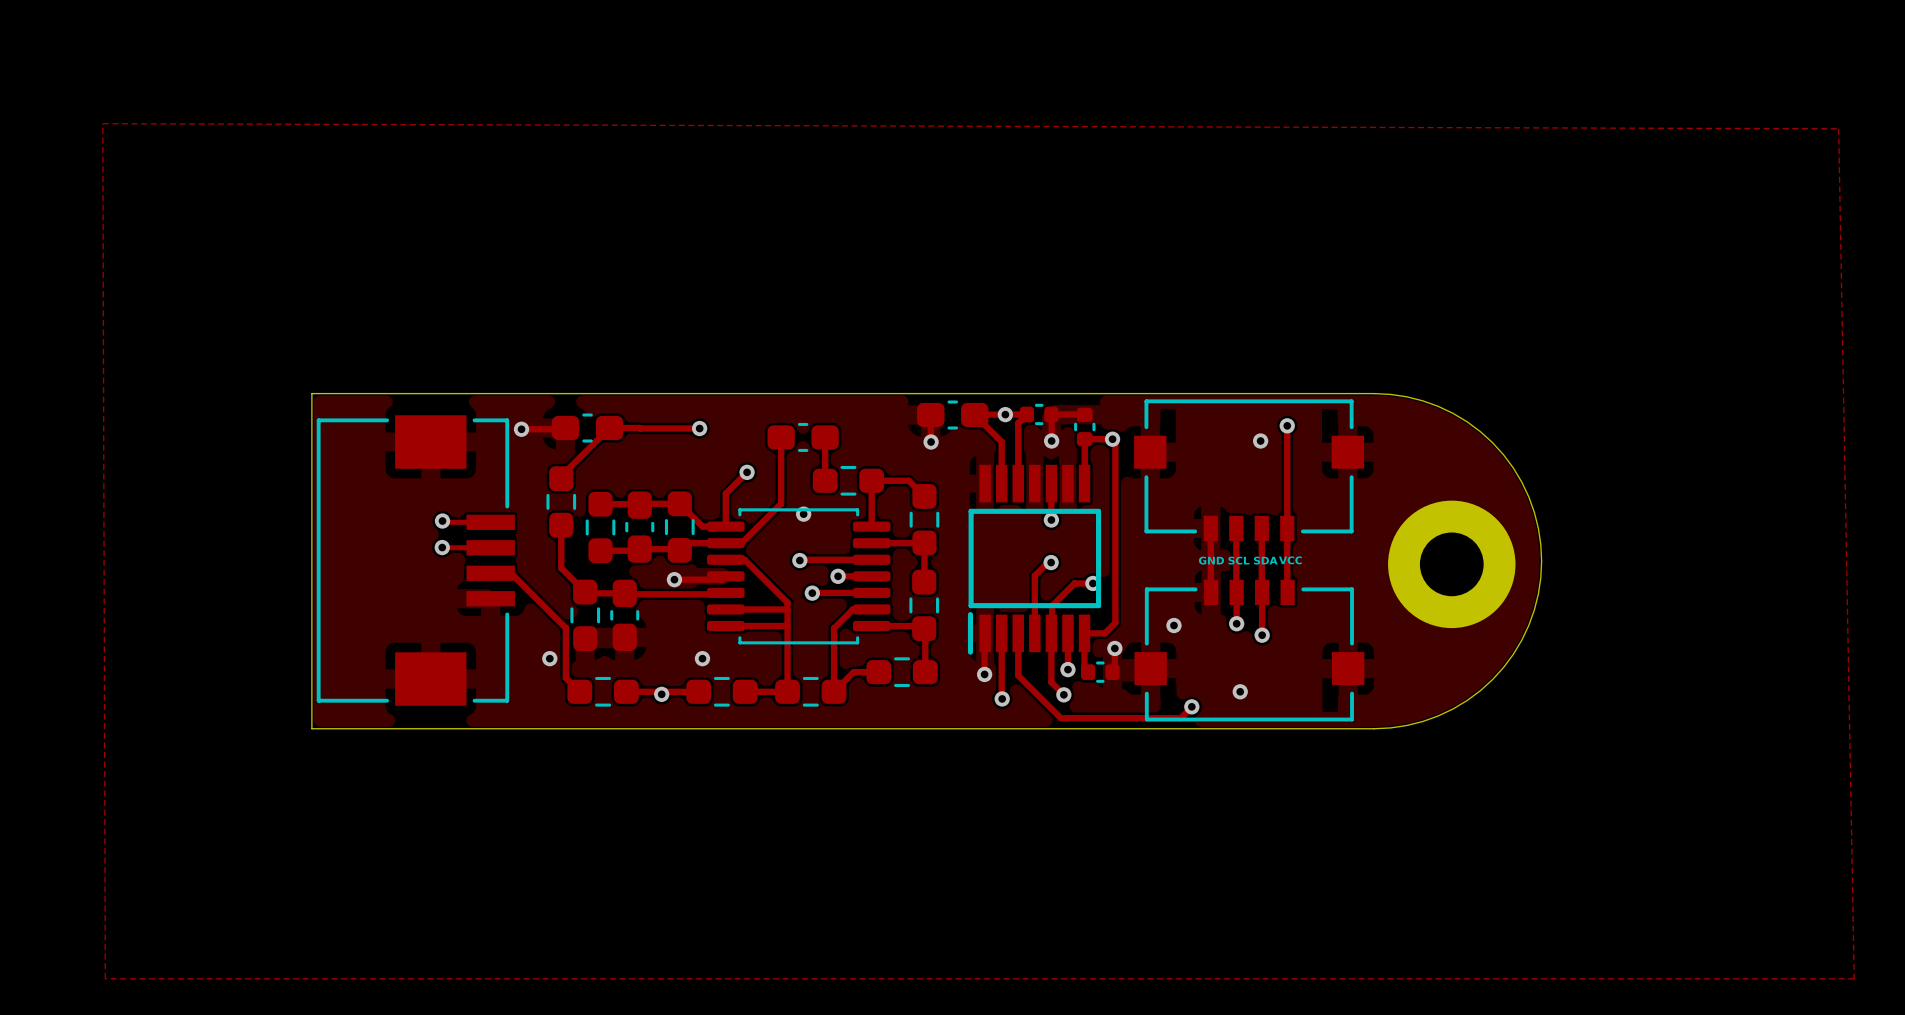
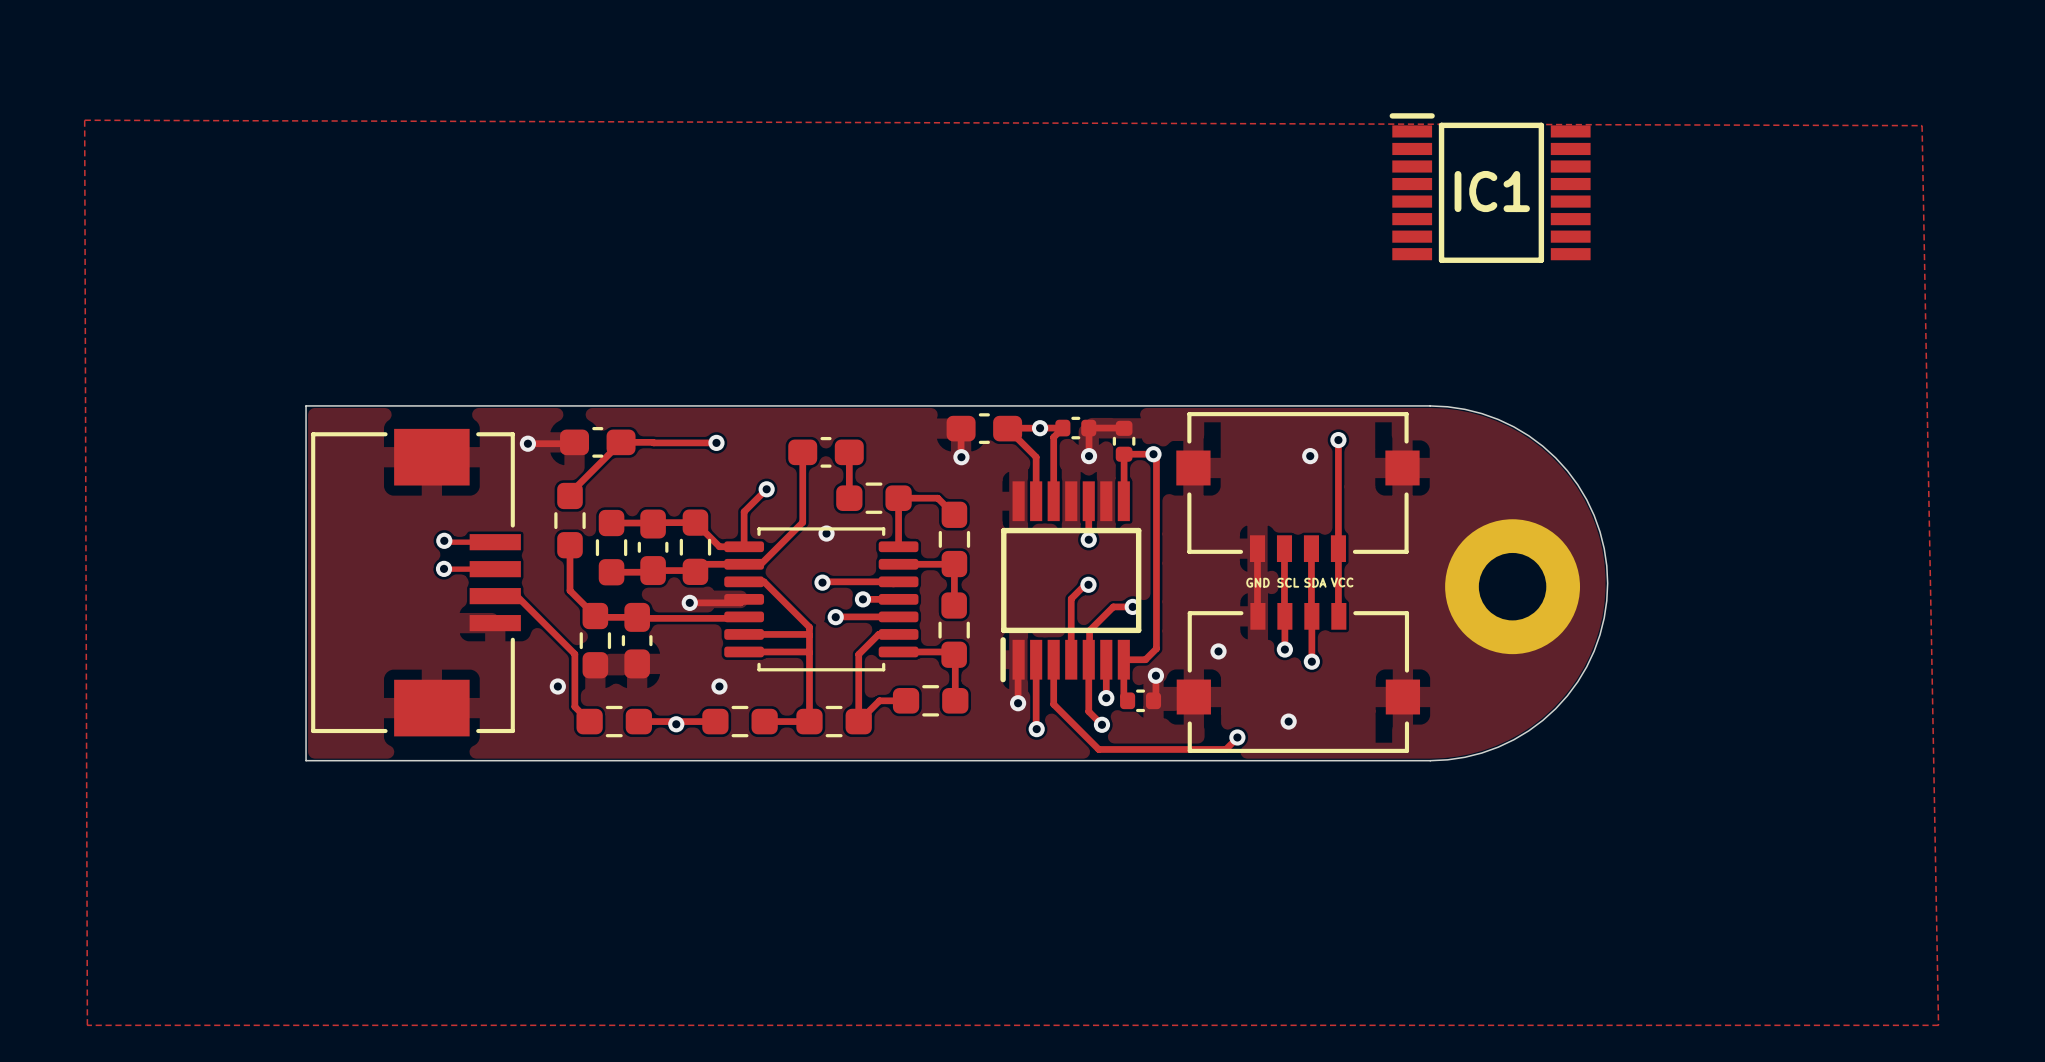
IC1: none -> (1490, 188)

